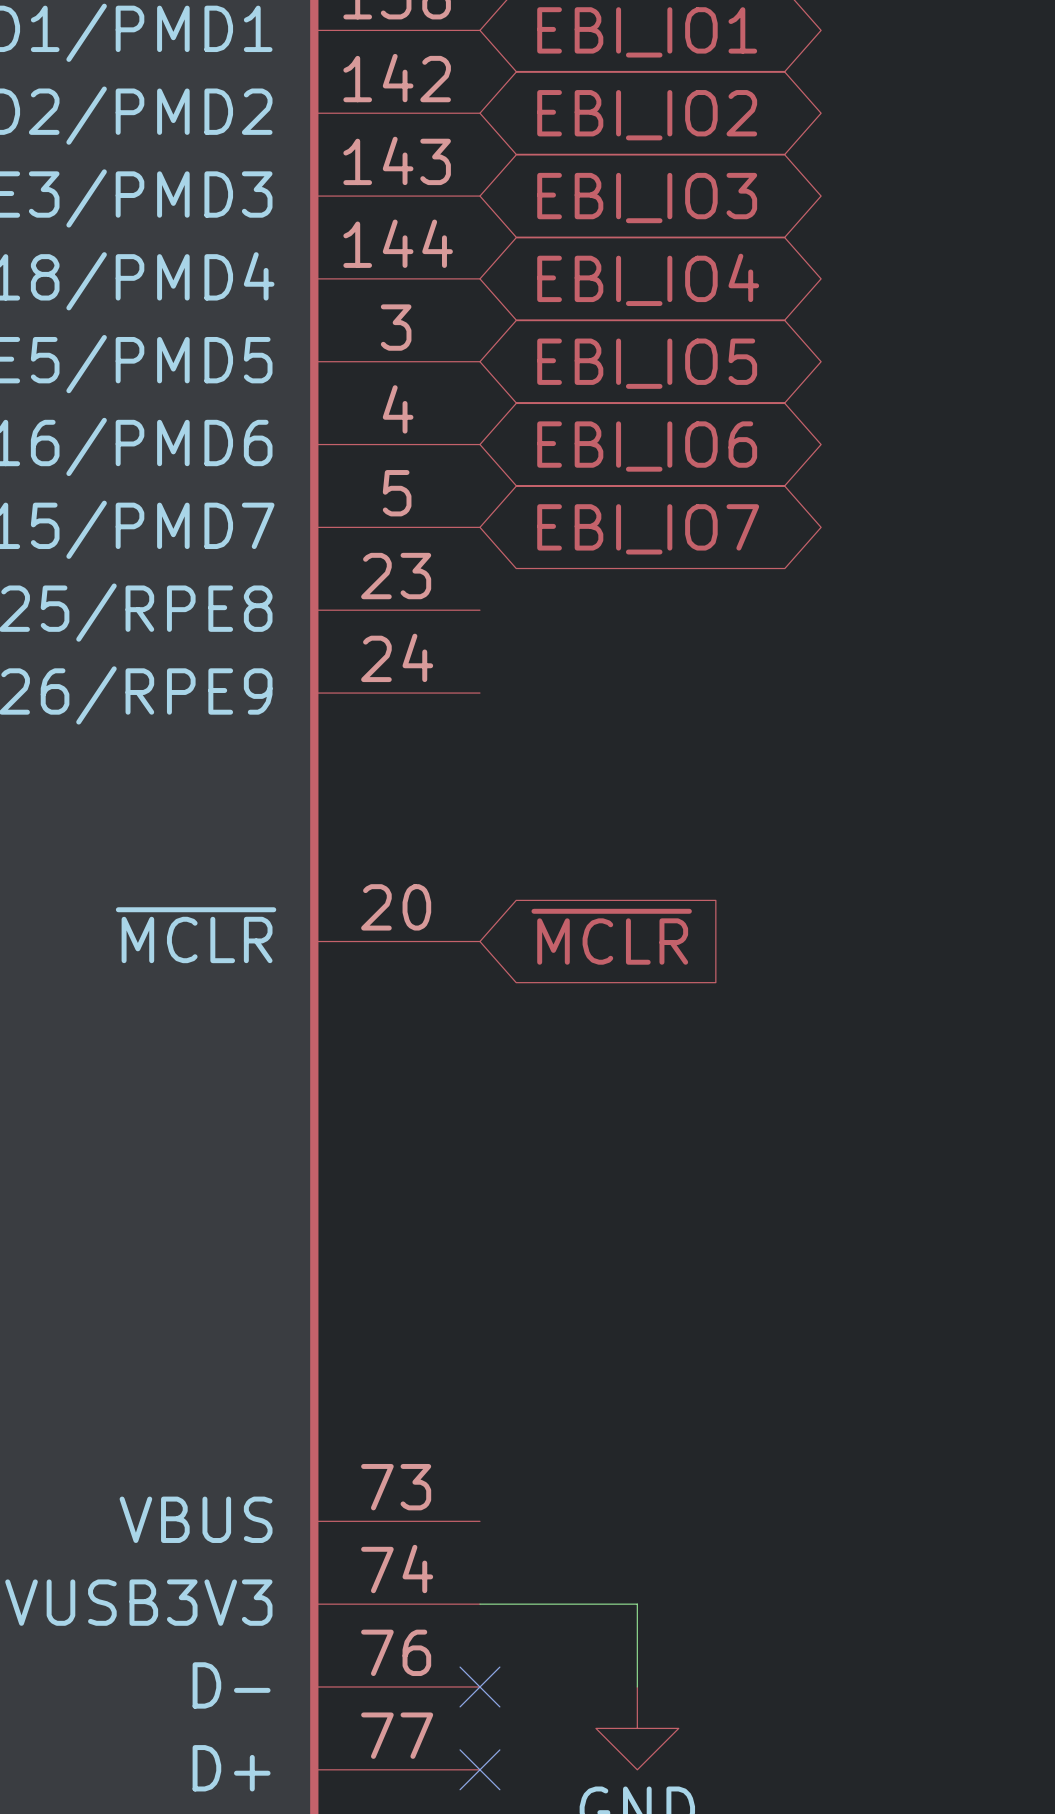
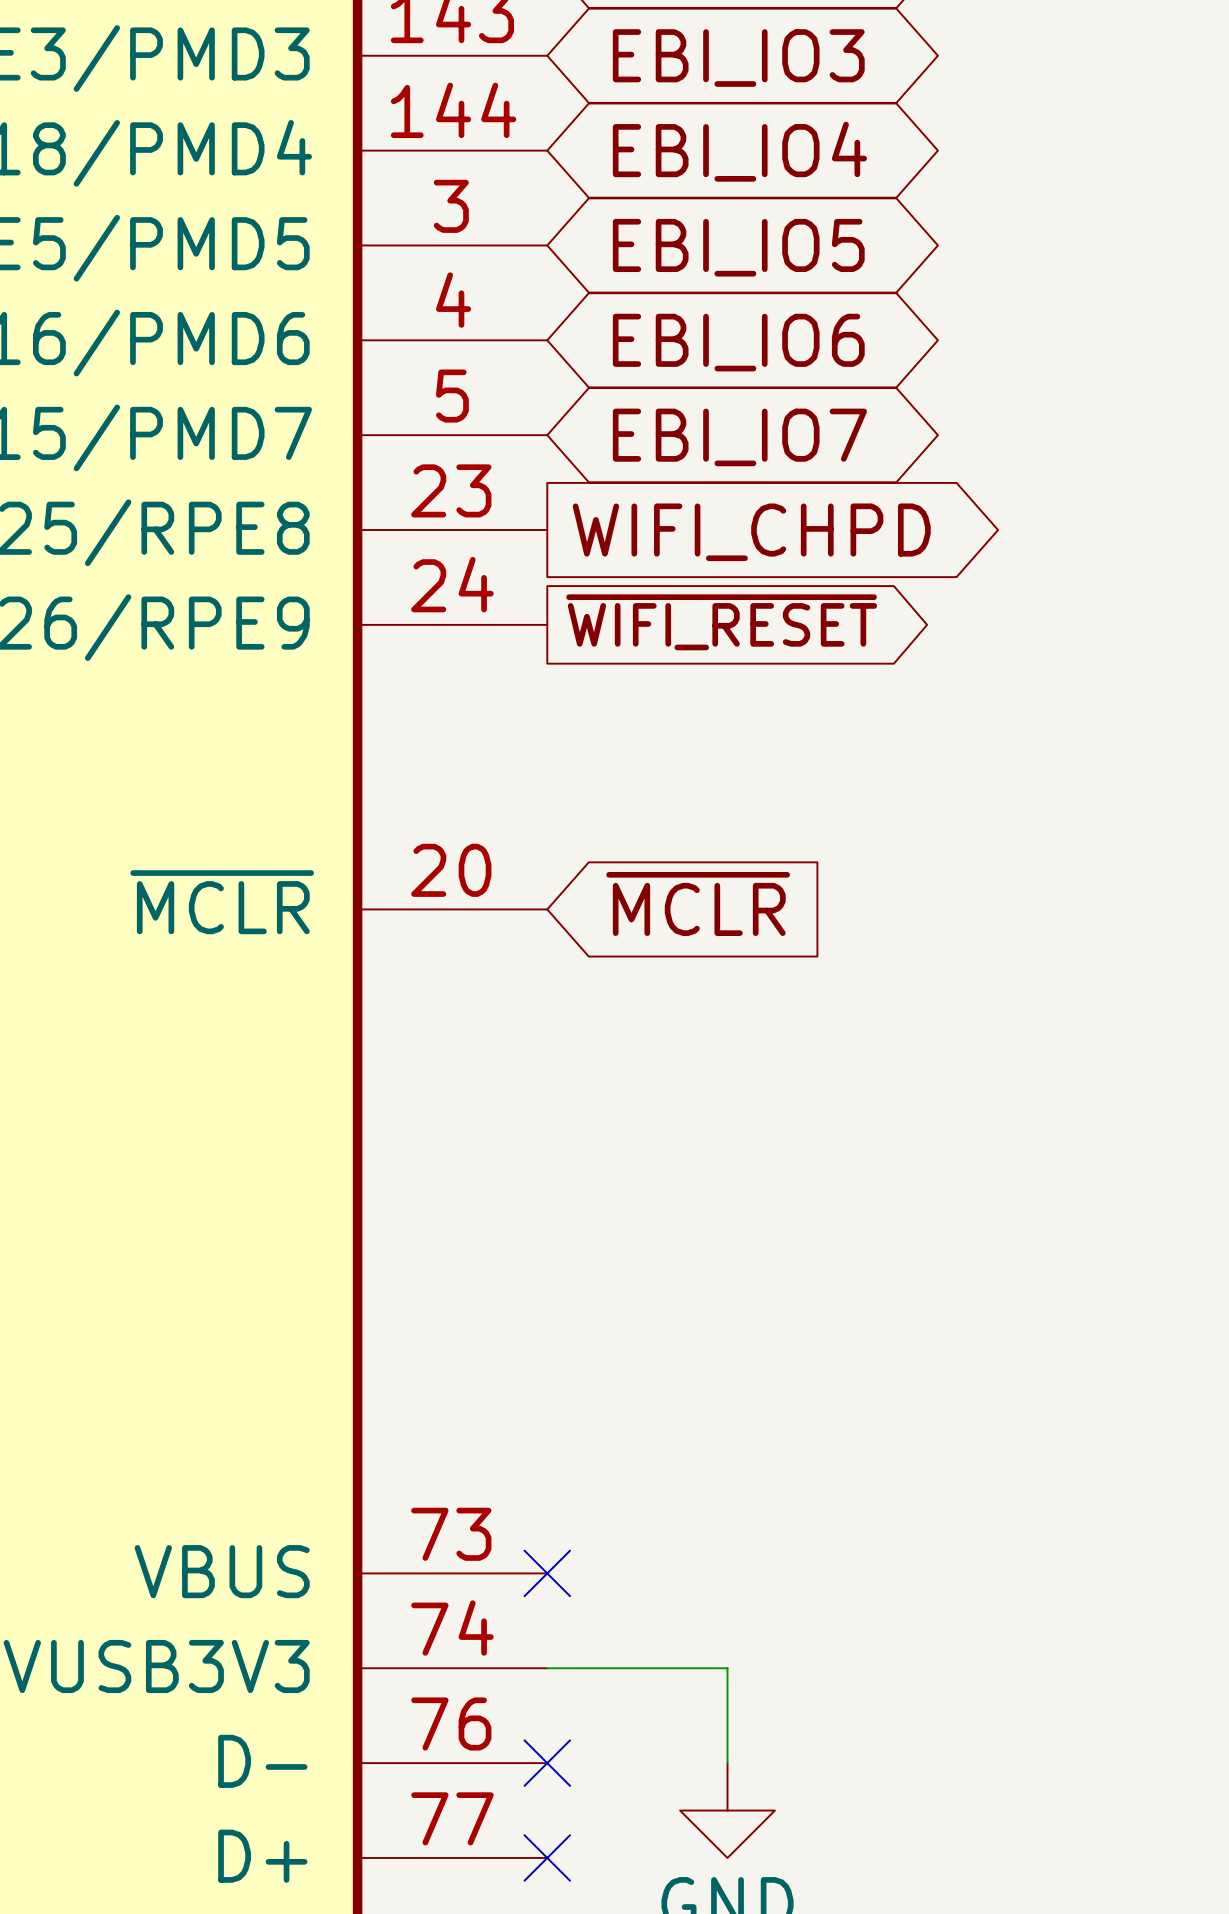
global label: none -> WIFI_CHPD (751, 532)
global label: none -> ~{WIFI_RESET} (721, 622)
no-connect mark: none -> (547, 1573)

